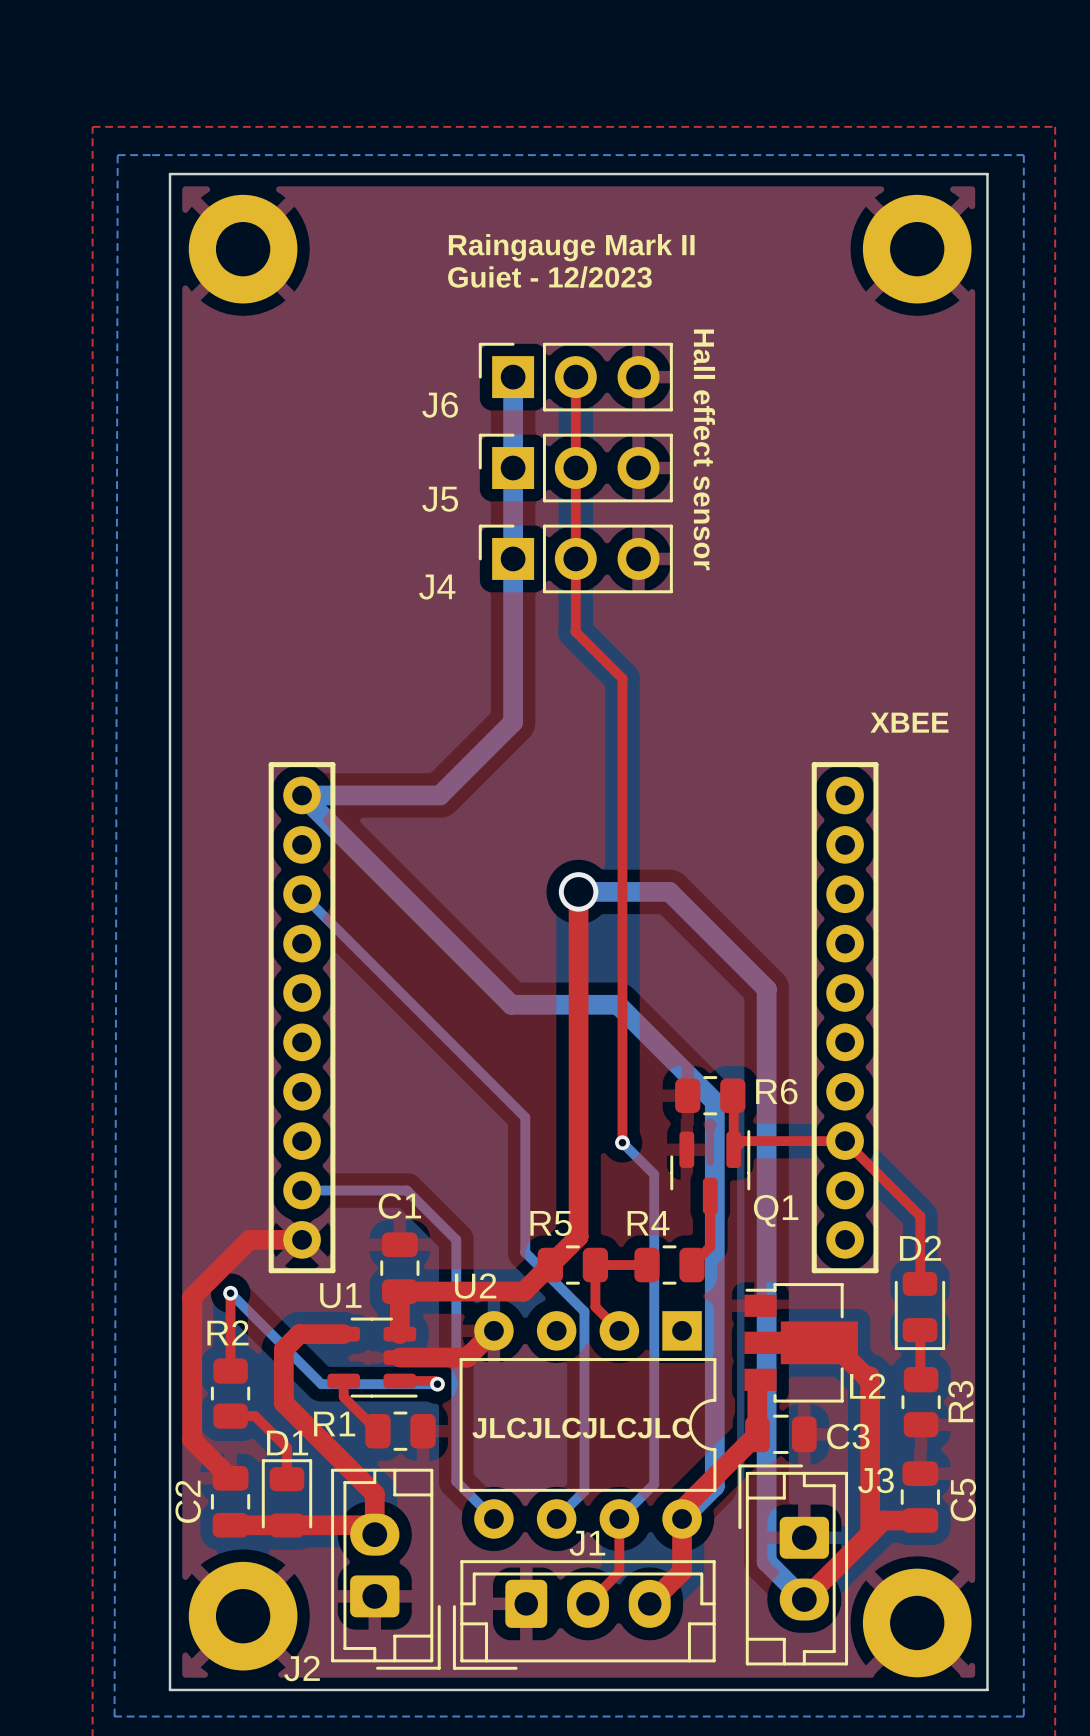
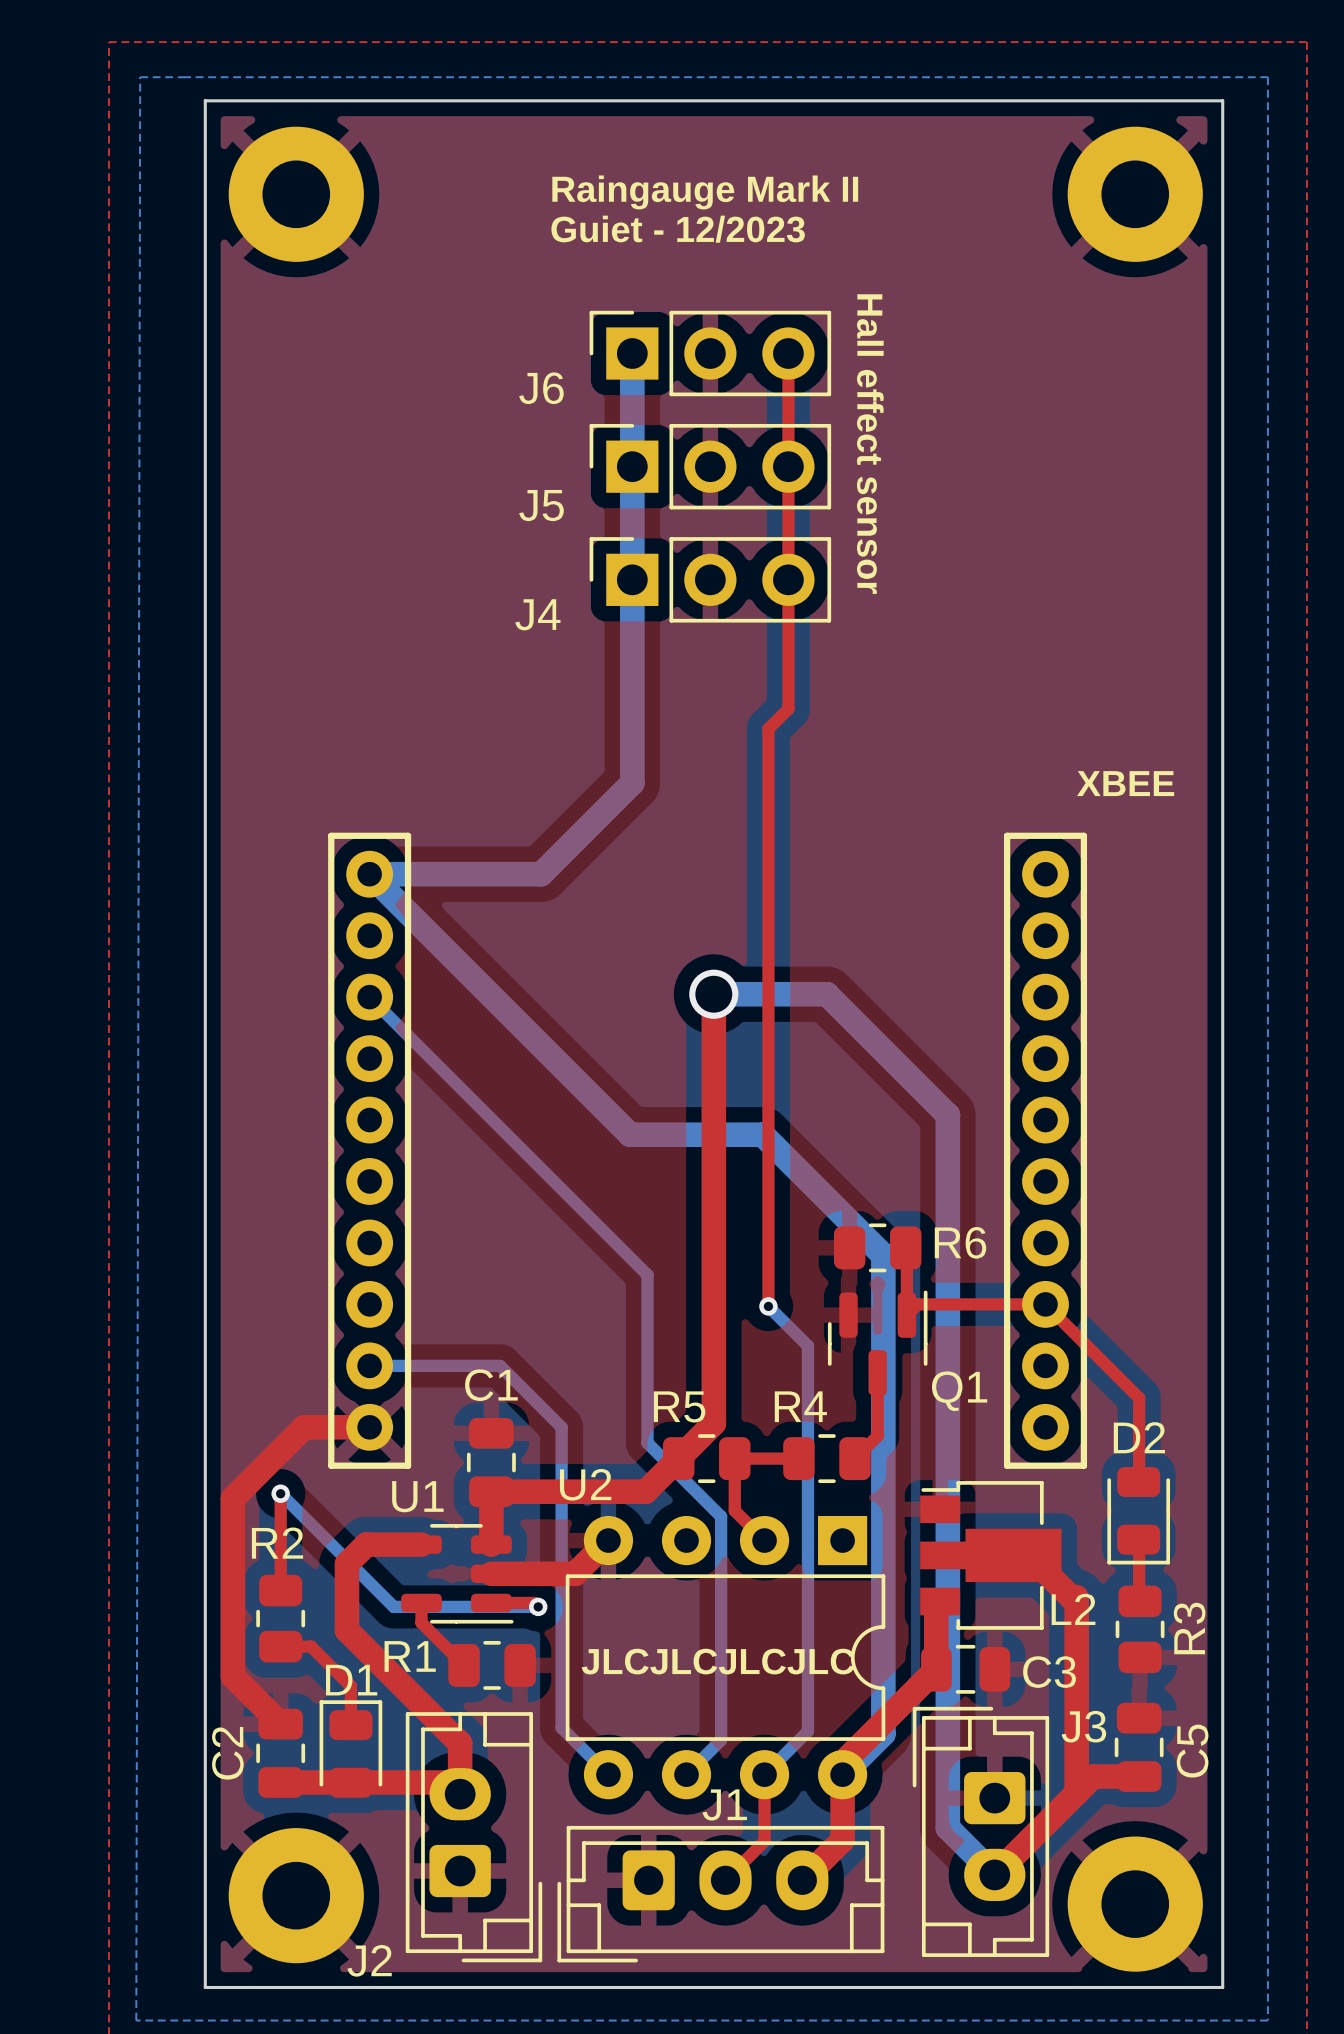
top track: (575, 377) (575, 631) (622, 678) -> (788, 353) (788, 708) (768, 728)

